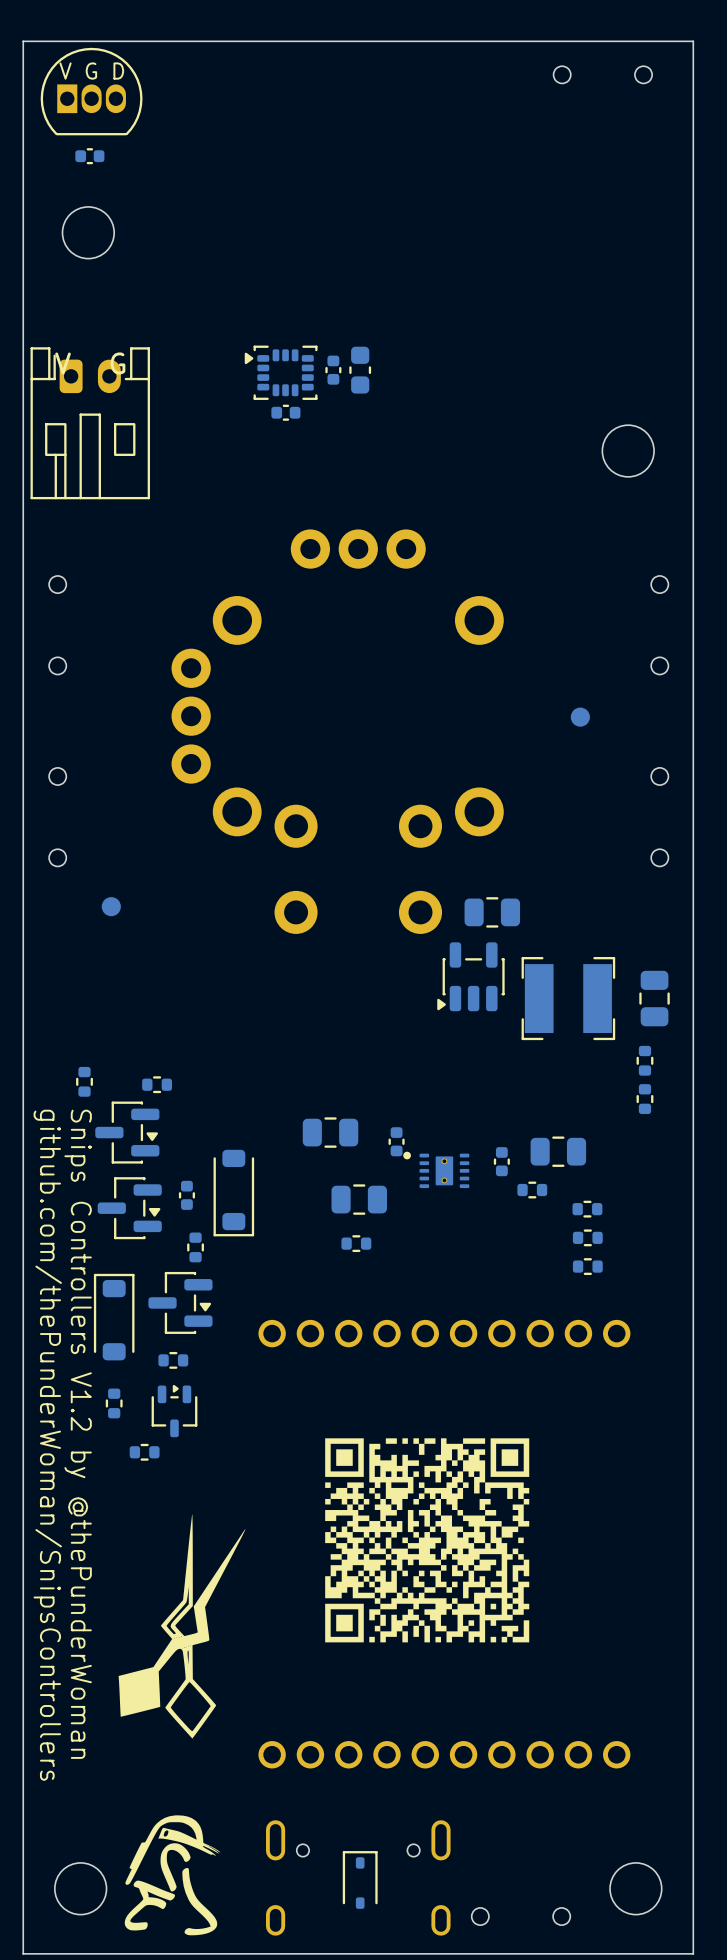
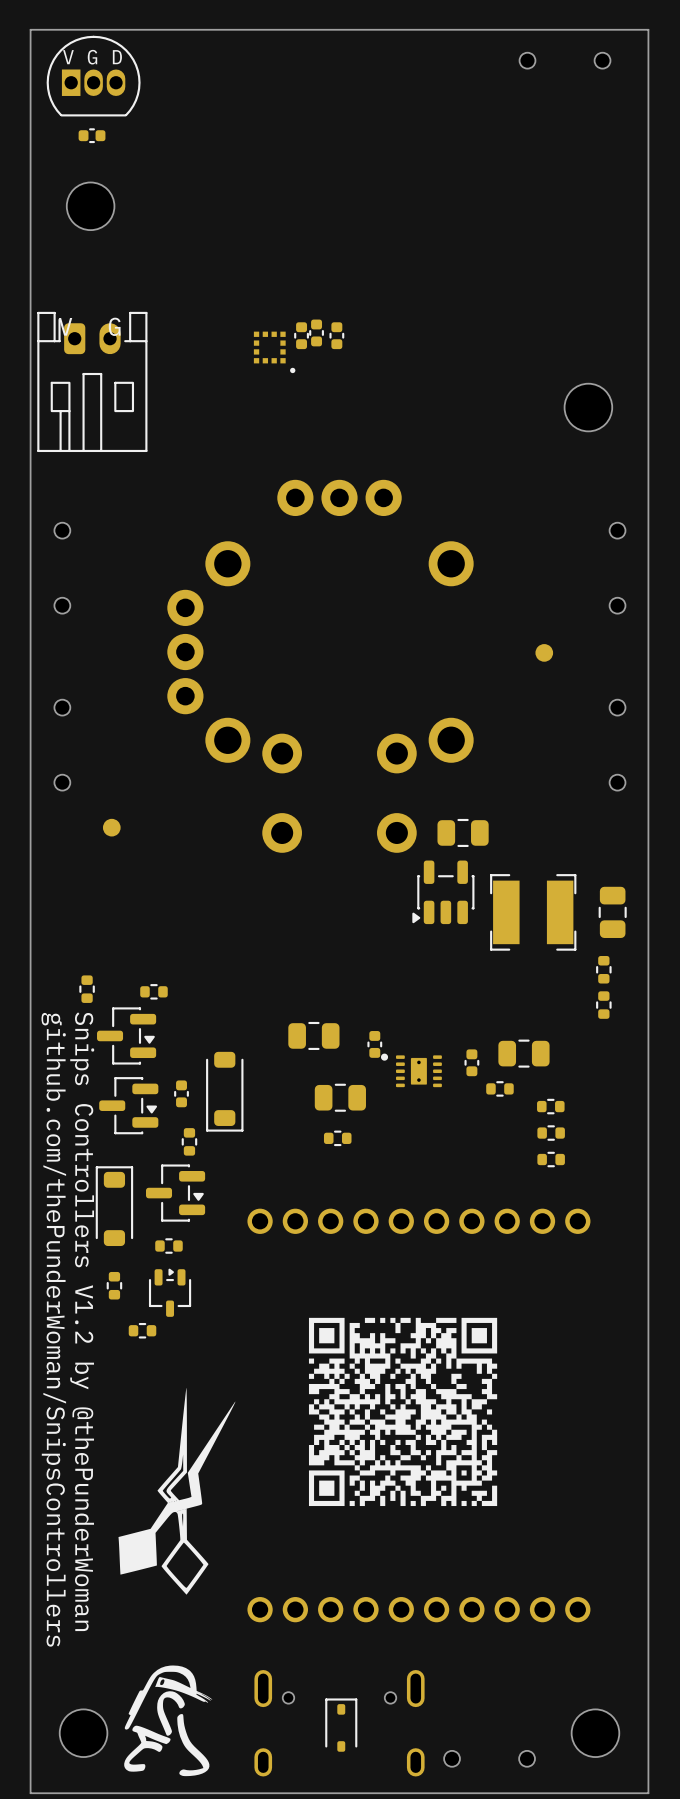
part footprint: [349, 346, 372, 394] -> [329, 322, 345, 350]
part: (281, 372) -> none
part: none -> (274, 352)
part rotation: 0° (285, 412) -> 90° clockwise (301, 335)
part position: (285, 412) -> (301, 335)

